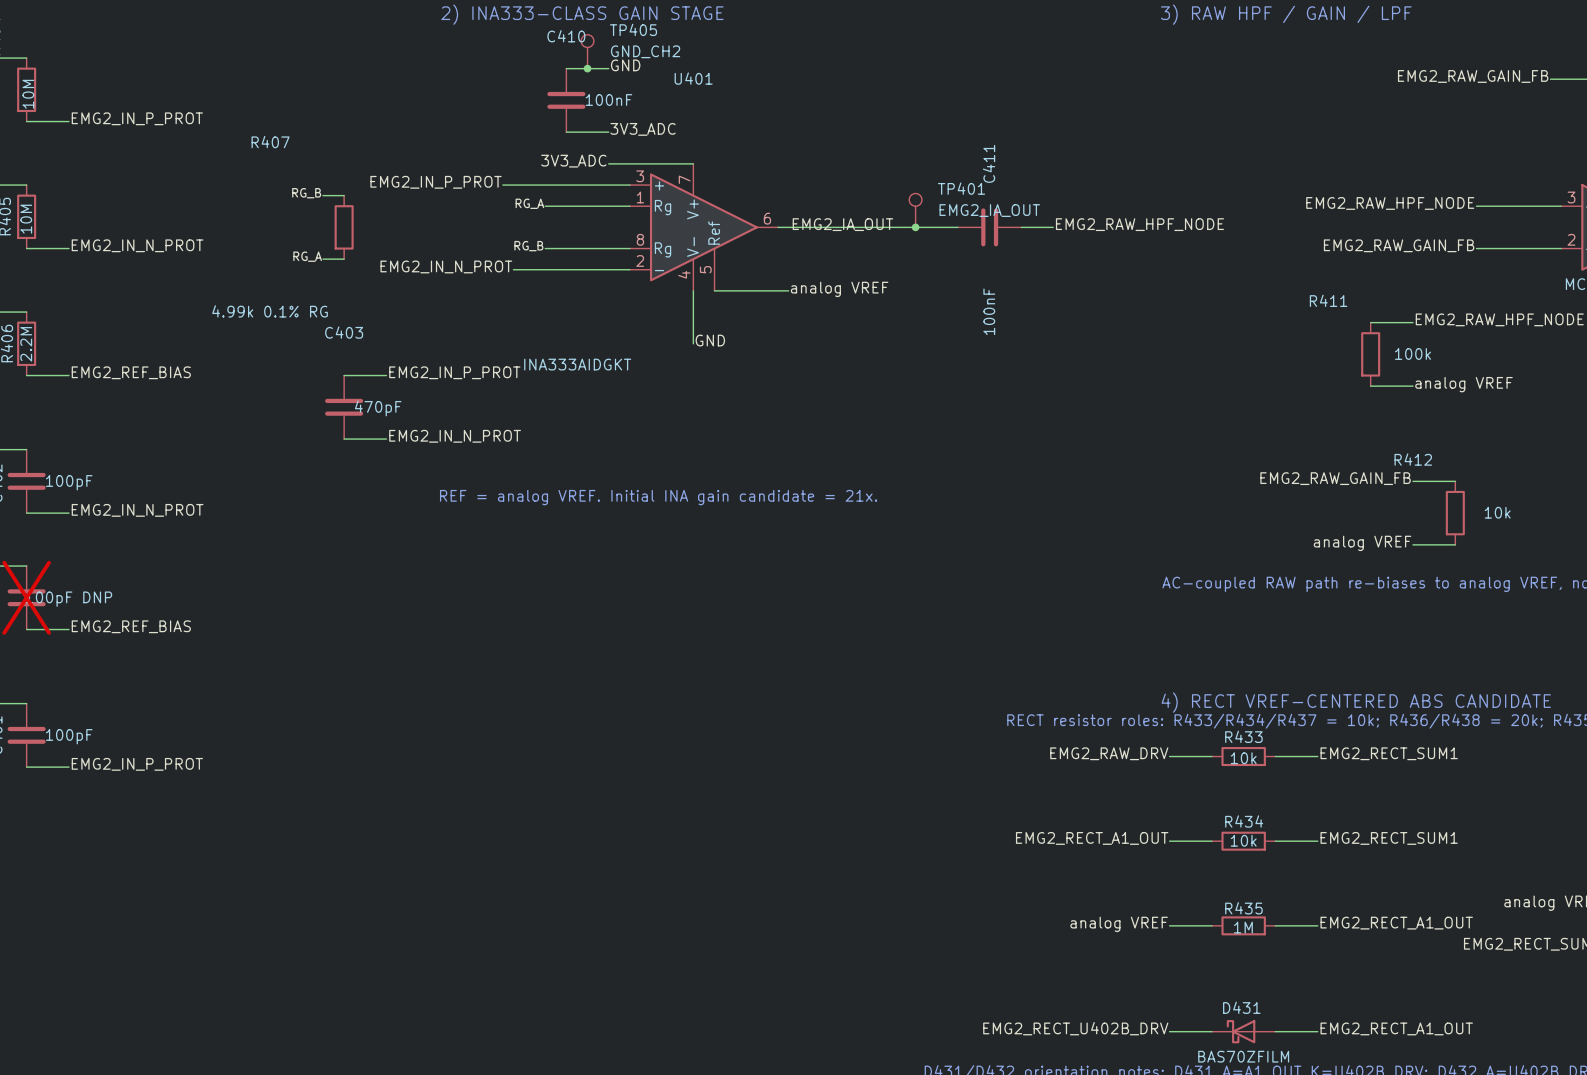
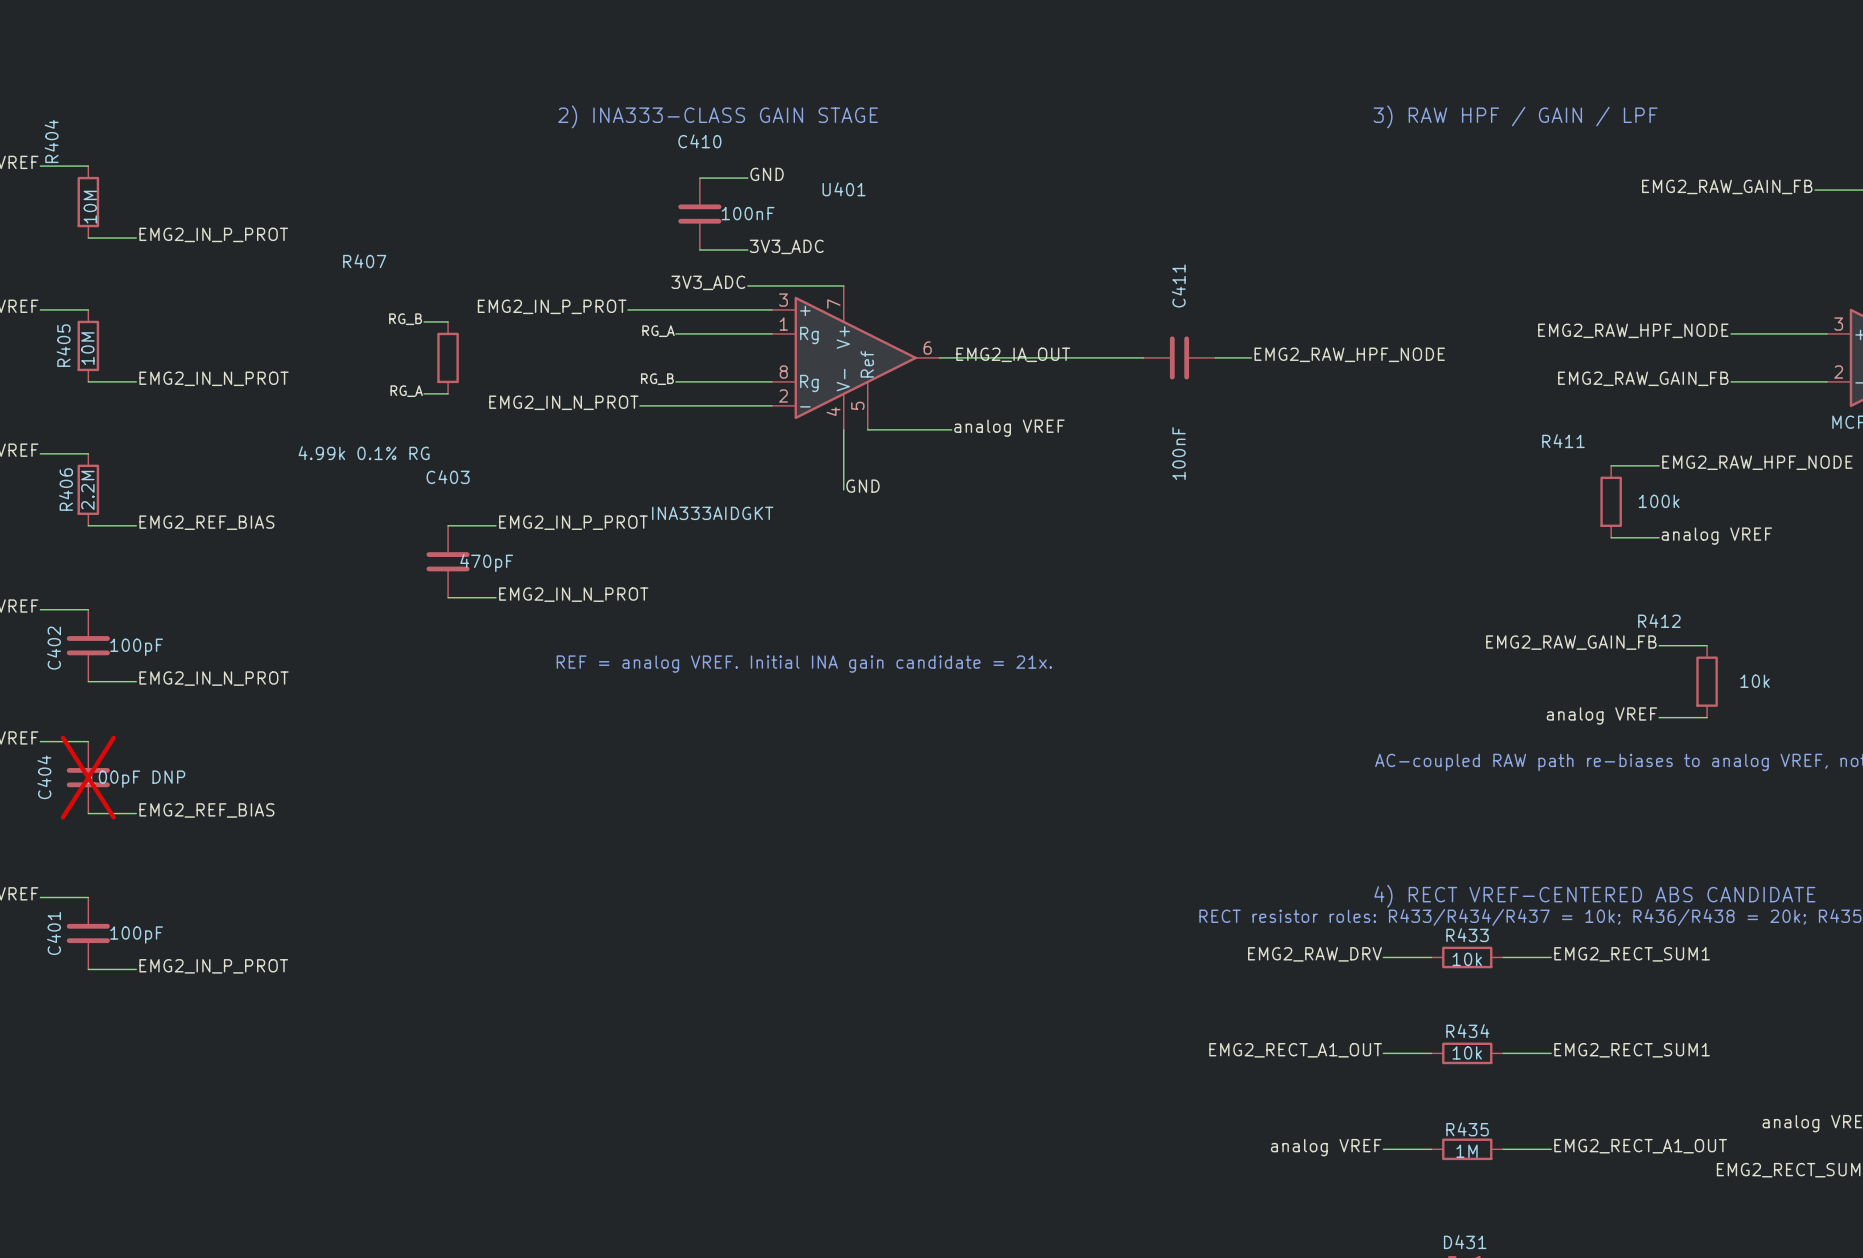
TP405: GND_CH2 (587, 51) -> none
junction: (587, 68) -> none
TP401: EMG2_IA_OUT (915, 210) -> none
junction: (915, 227) -> none

